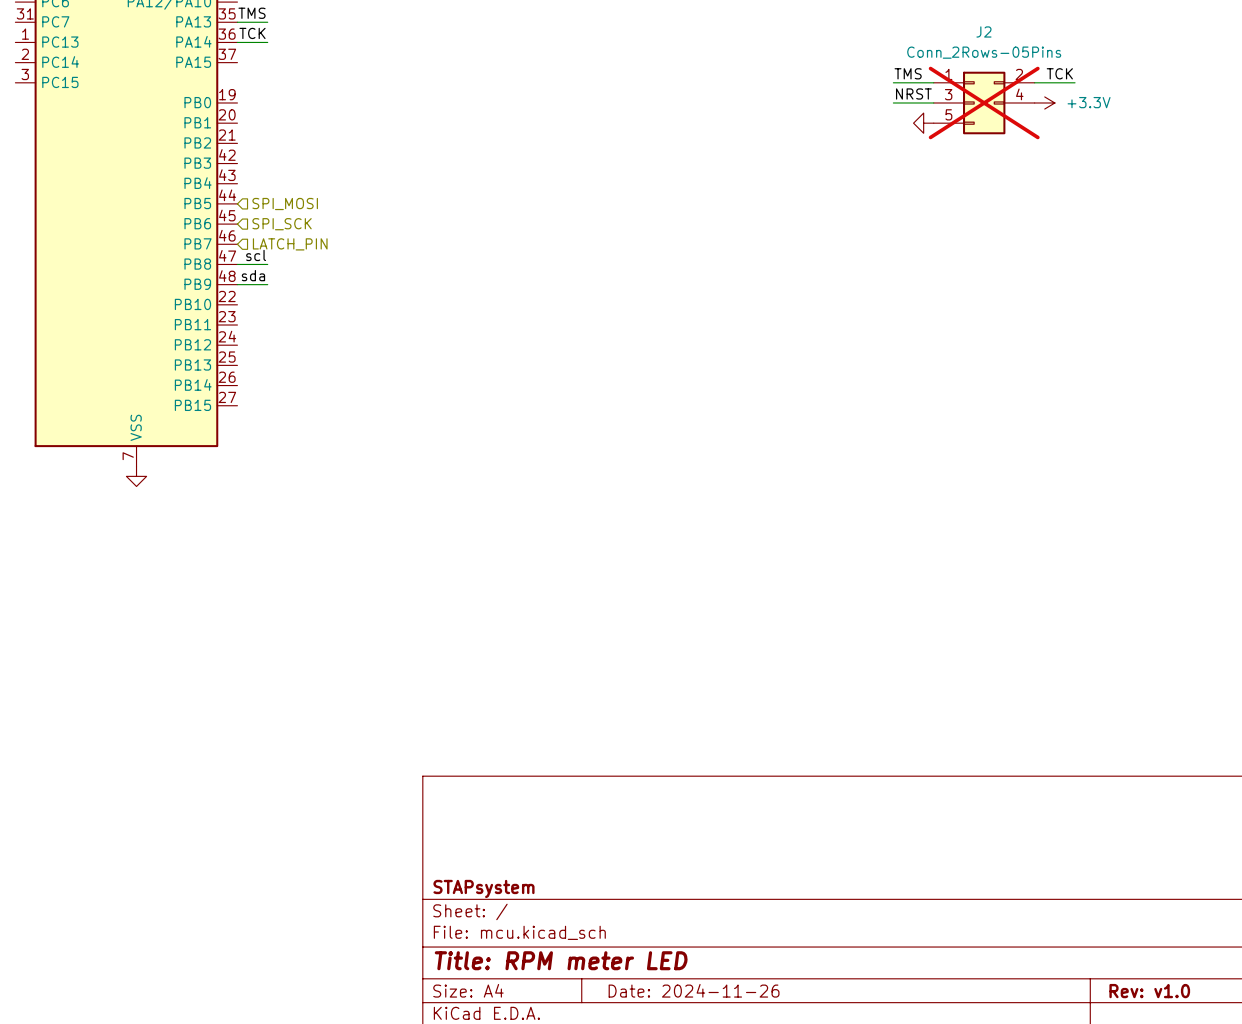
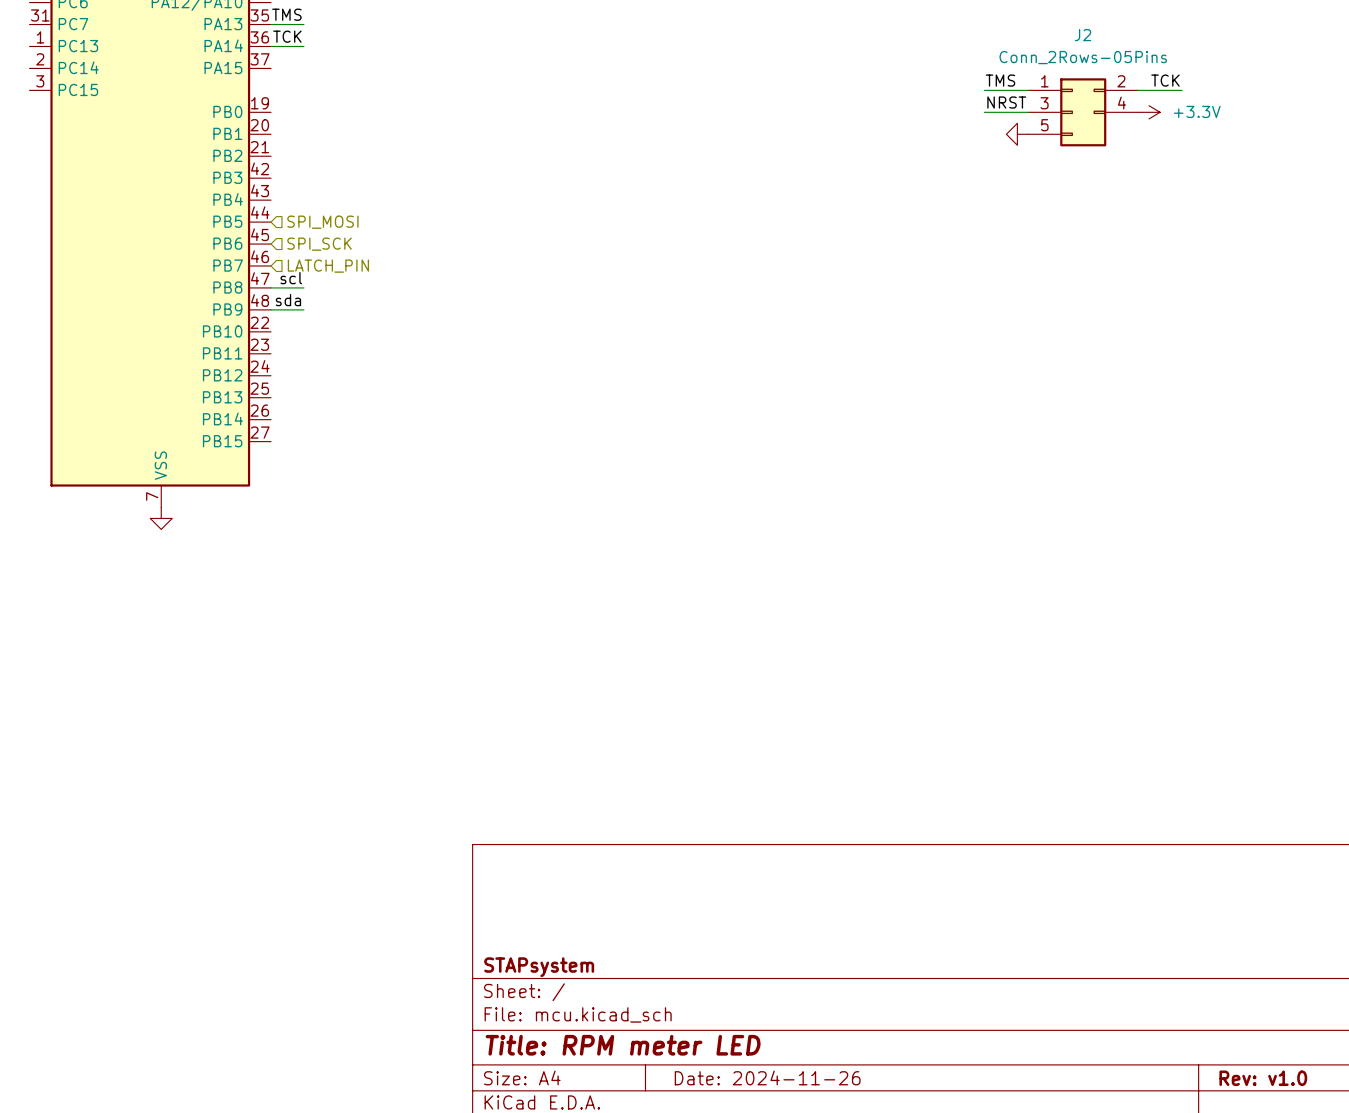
J2 do-not-place cross: (984, 102) -> none

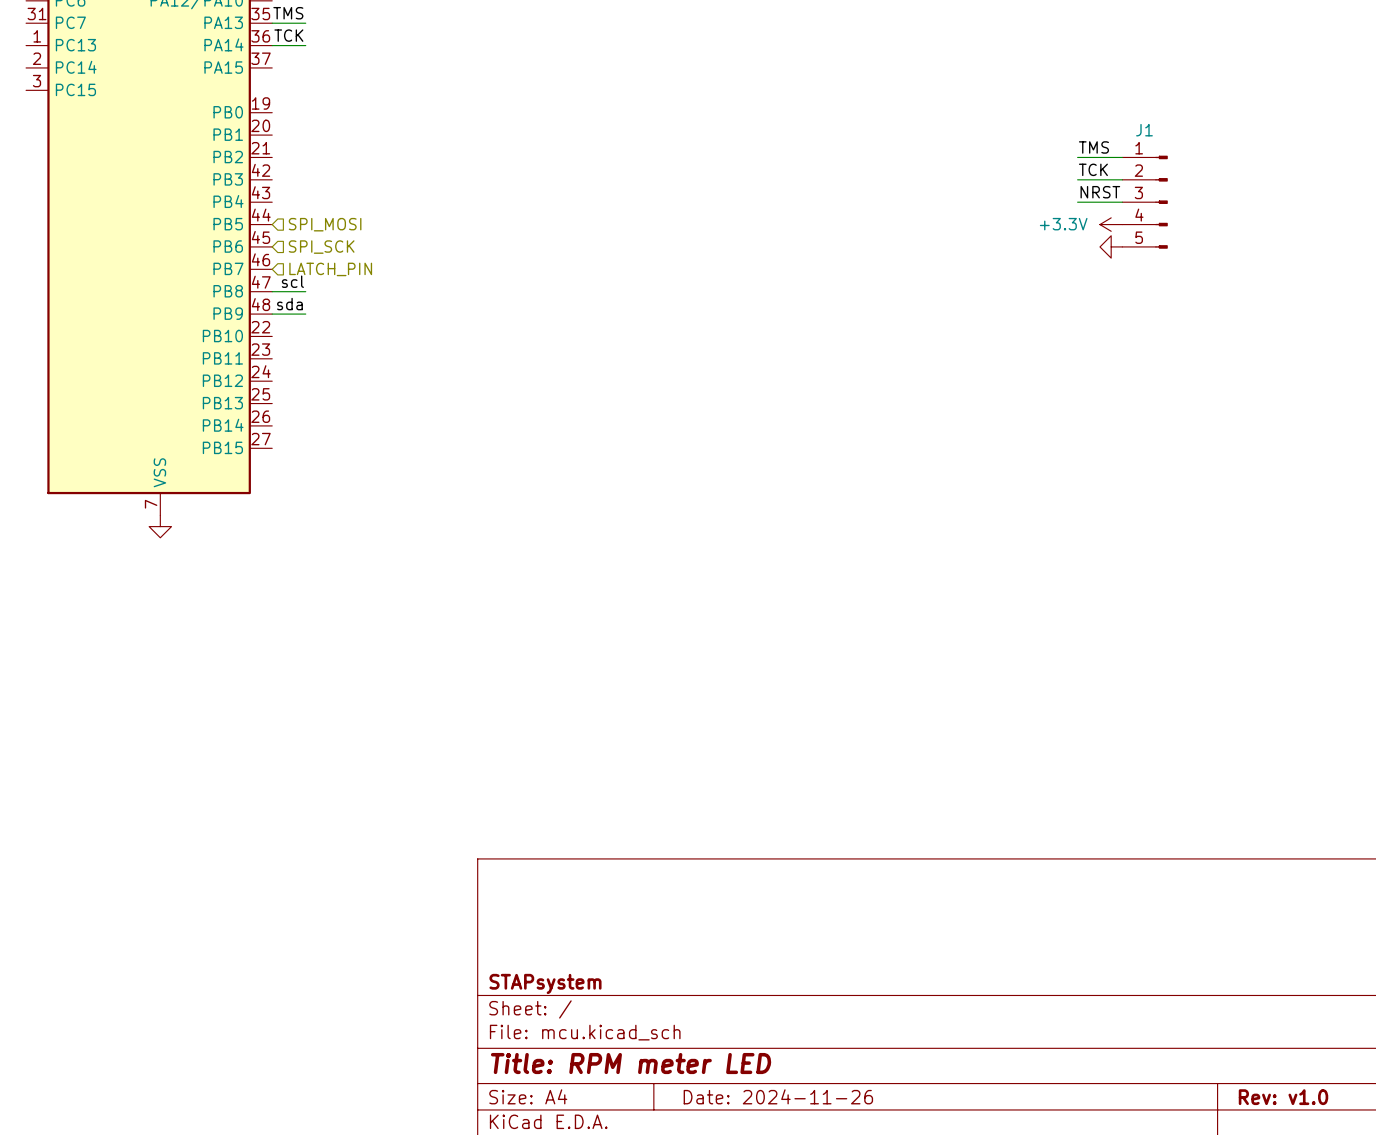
label position: TMS (1000, 80) -> TMS (1093, 147)
label position: TCK (1165, 80) -> TCK (1093, 169)
wire: (984, 90) (1028, 90) -> (1077, 202) (1122, 202)
wire: (1138, 90) (1182, 90) -> (1077, 179) (1122, 179)
label position: NRST (1006, 102) -> NRST (1100, 192)
wire: (984, 112) (1028, 112) -> (1077, 157) (1122, 157)
J2: Conn_2Rows-05Pins (1083, 112) -> none
power symbol rotation: 0° (1149, 112) -> 180° (1111, 224)
power symbol position: +3.3V (1149, 112) -> +3.3V (1111, 224)
power symbol position: (1017, 134) -> (1111, 246)
J1: none -> (1145, 202)

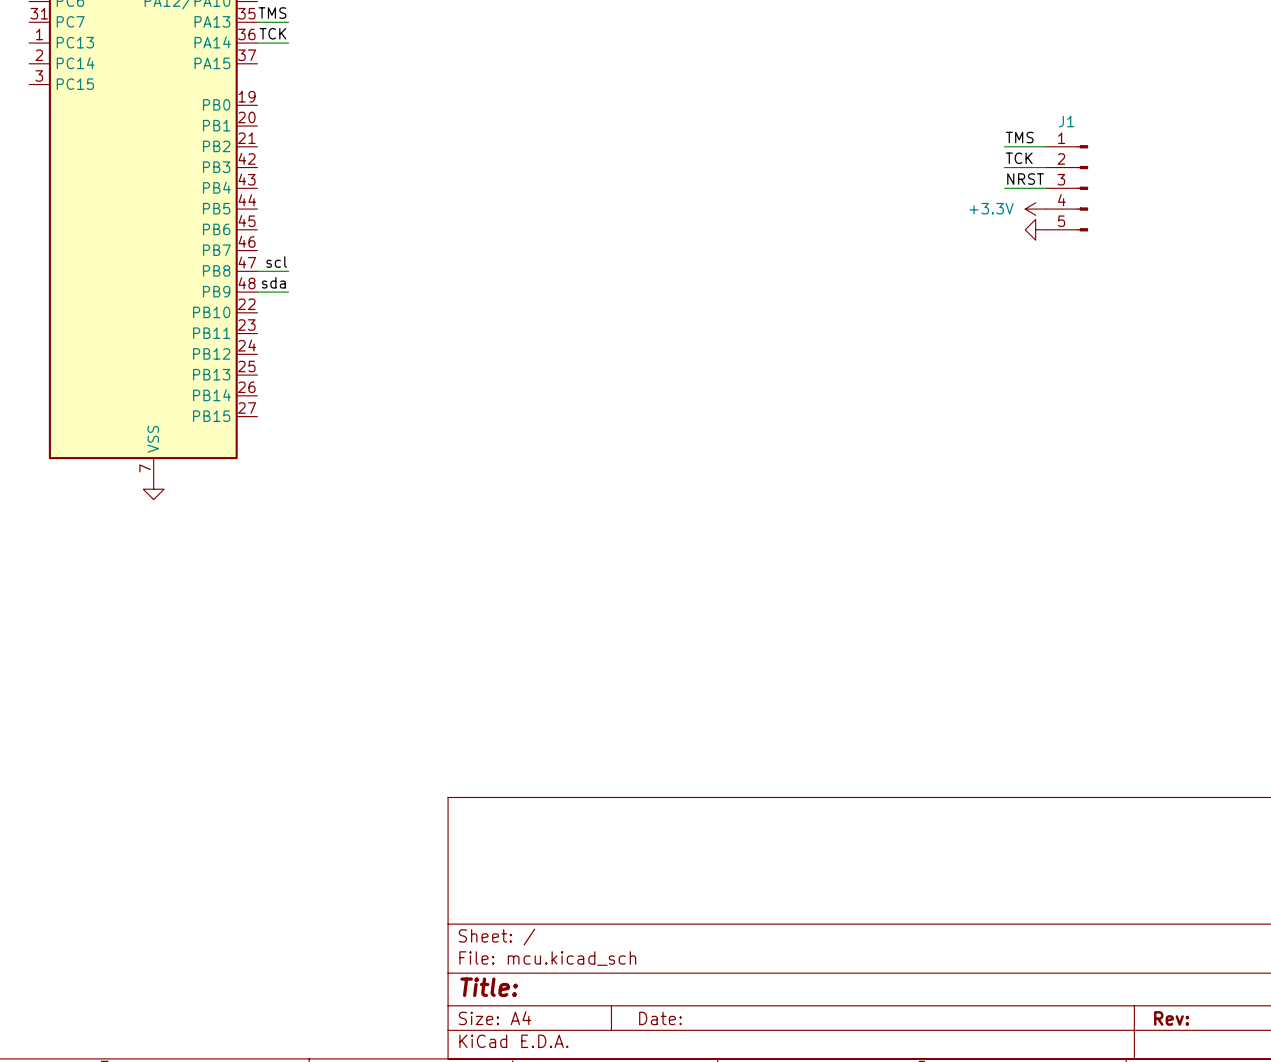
hierarchical label: SPI_MOSI (325, 224) -> none
hierarchical label: SPI_SCK (321, 247) -> none
hierarchical label: LATCH_PIN (330, 269) -> none
title block: STAPsystem (545, 983) -> none
title block: Title: RPM meter LED (631, 1063) -> Title: (489, 987)
title block: Date: 2024-11-26 (778, 1096) -> Date: (660, 1018)
title block: Rev: v1.0 (1283, 1097) -> Rev: (1171, 1018)

